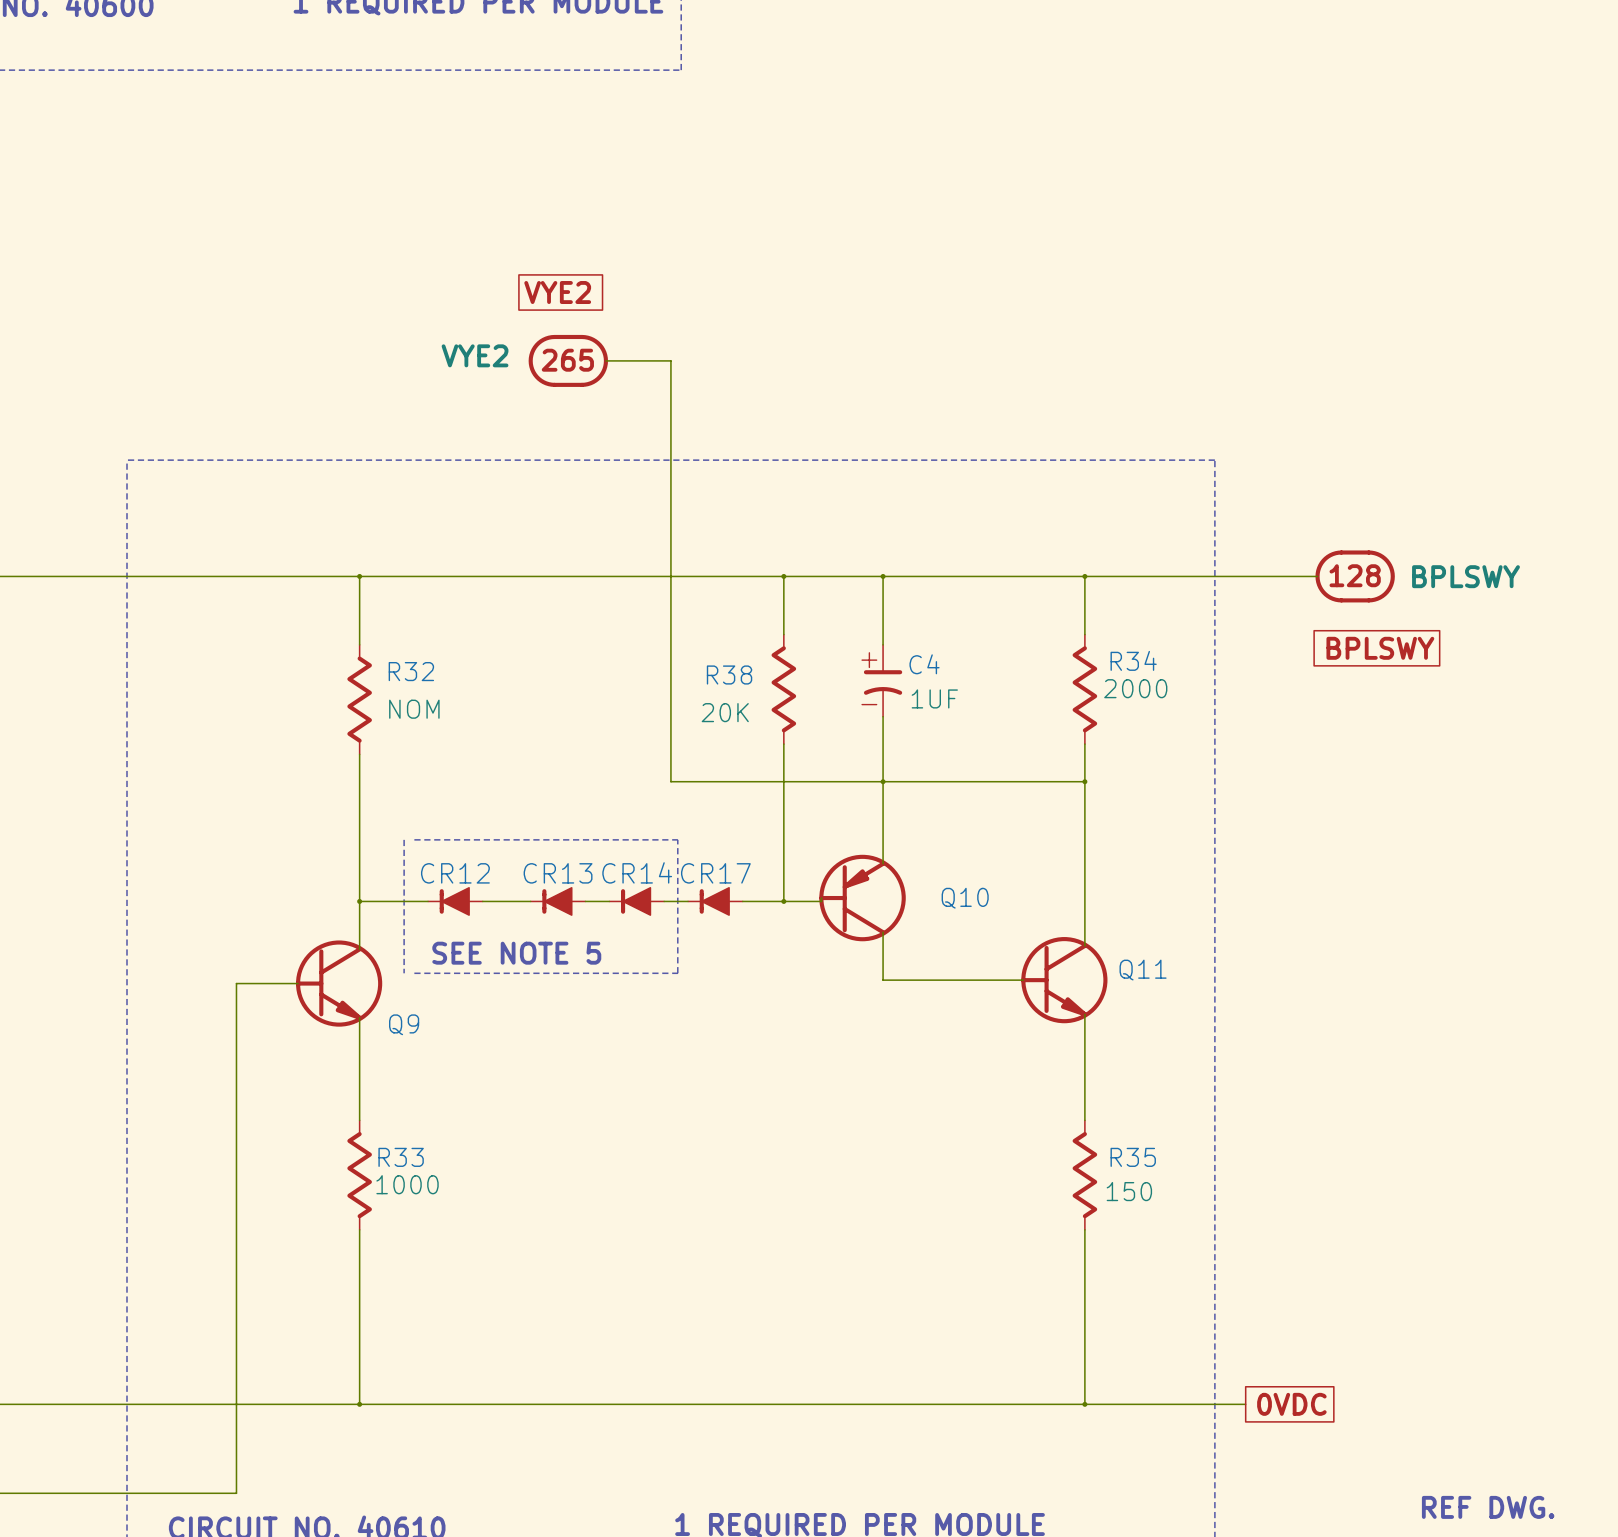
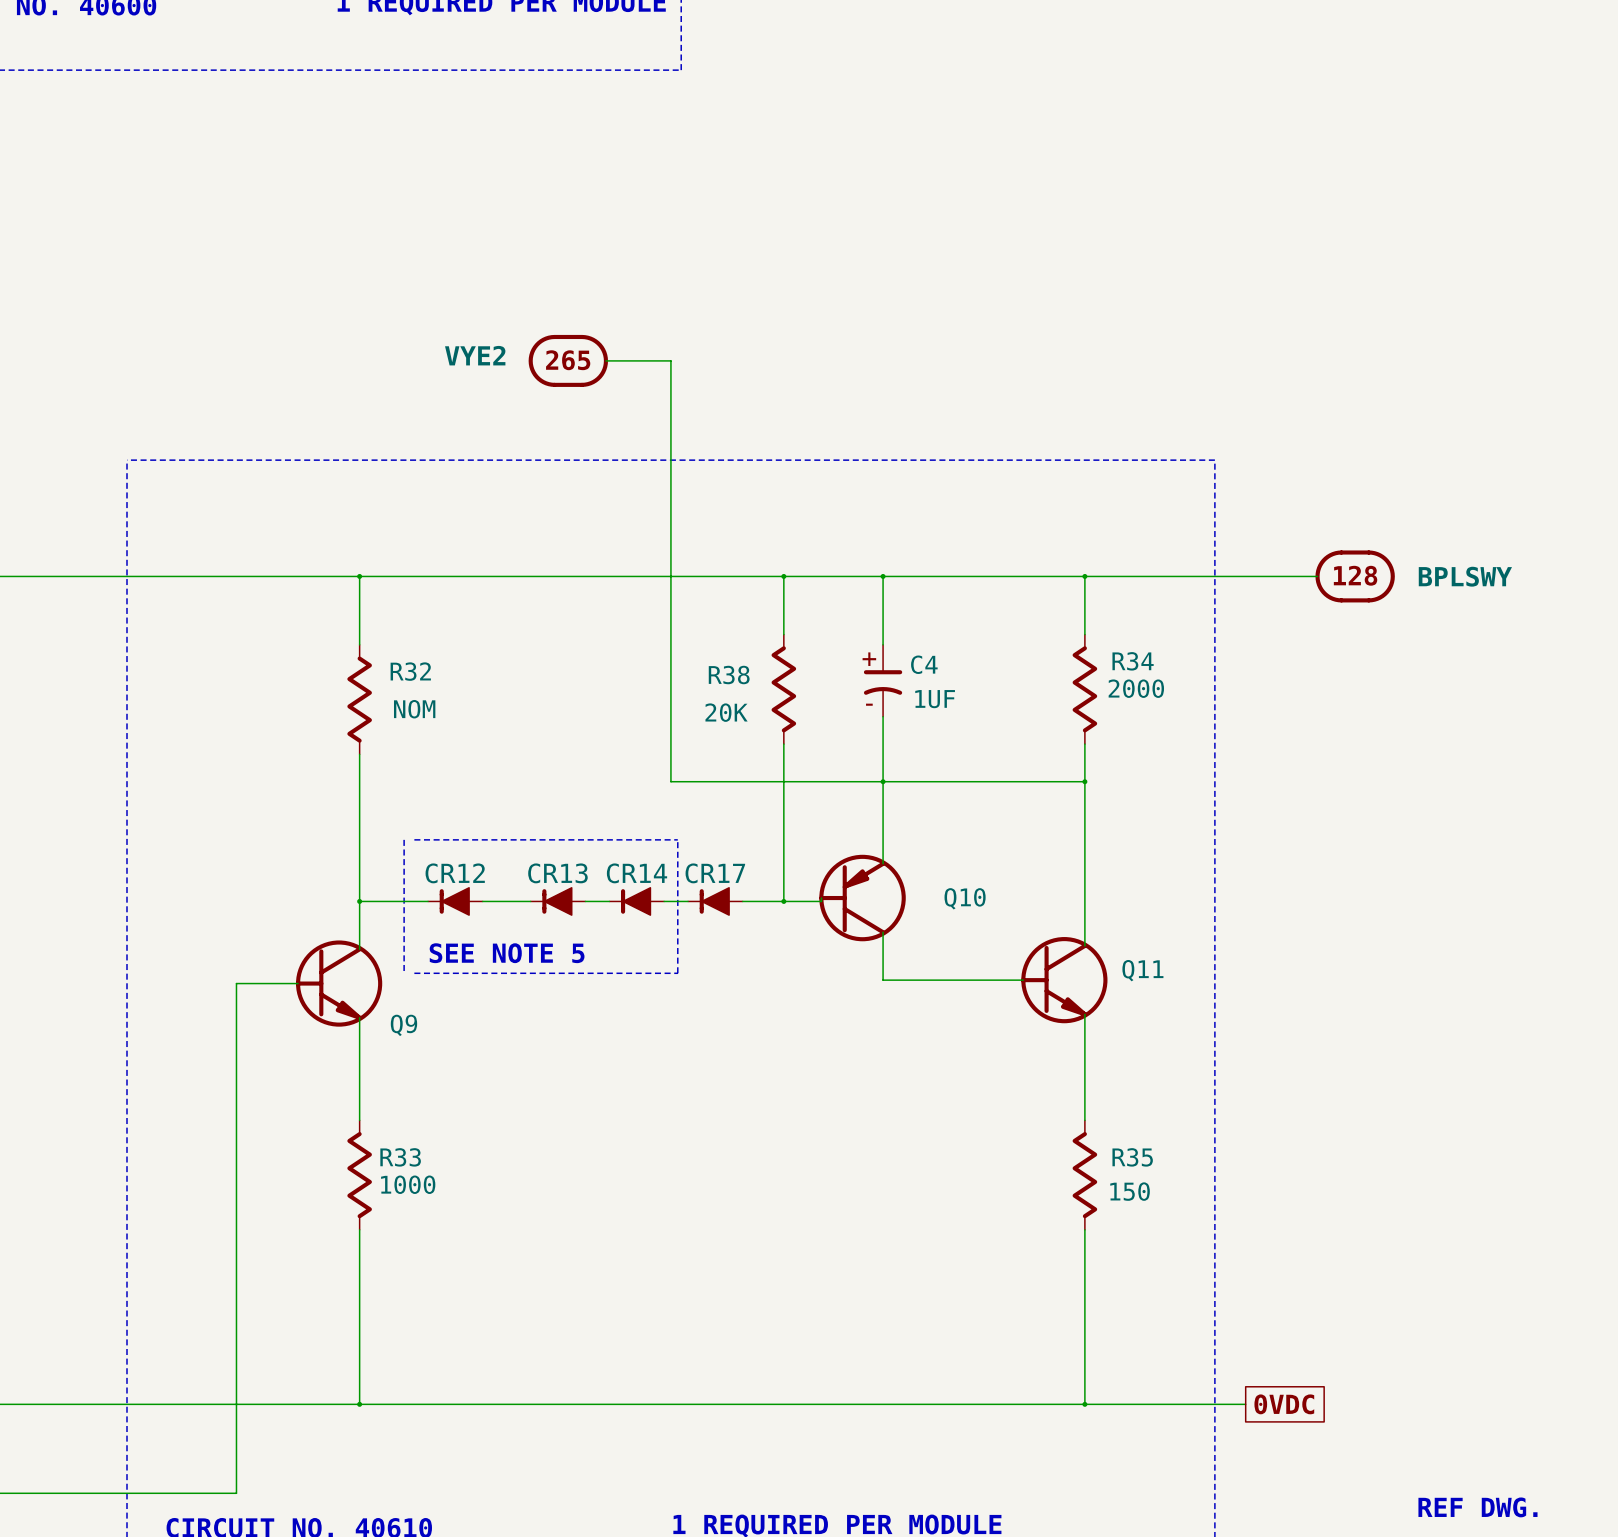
global label: VYE2 (557, 292) -> none
global label: BPLSWY (1380, 648) -> none

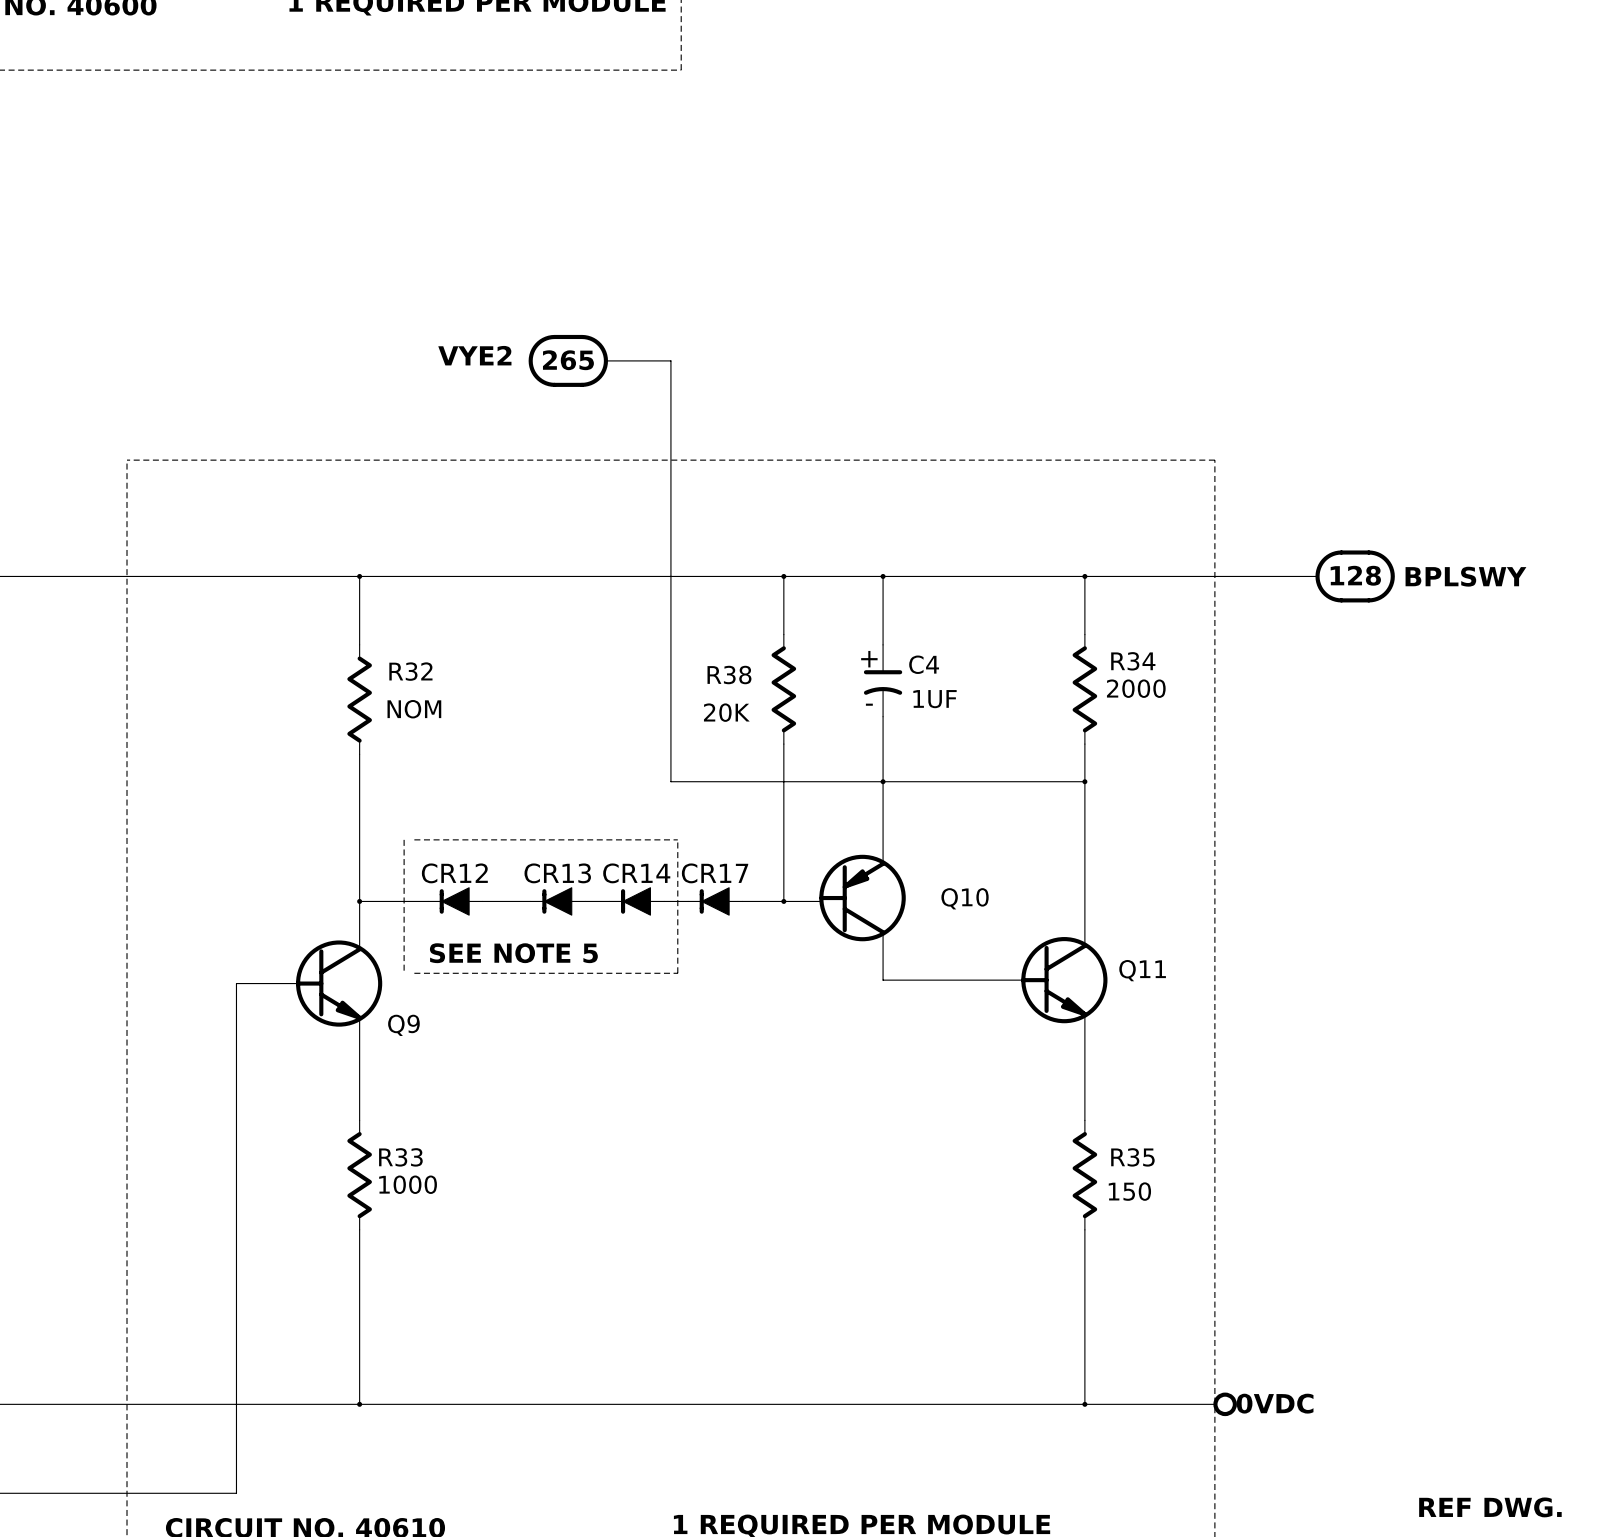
wire: (1214, 1404) (1245, 1404) -> none
part: none -> (1225, 1404)
global label: 0VDC (1284, 1404) -> none

